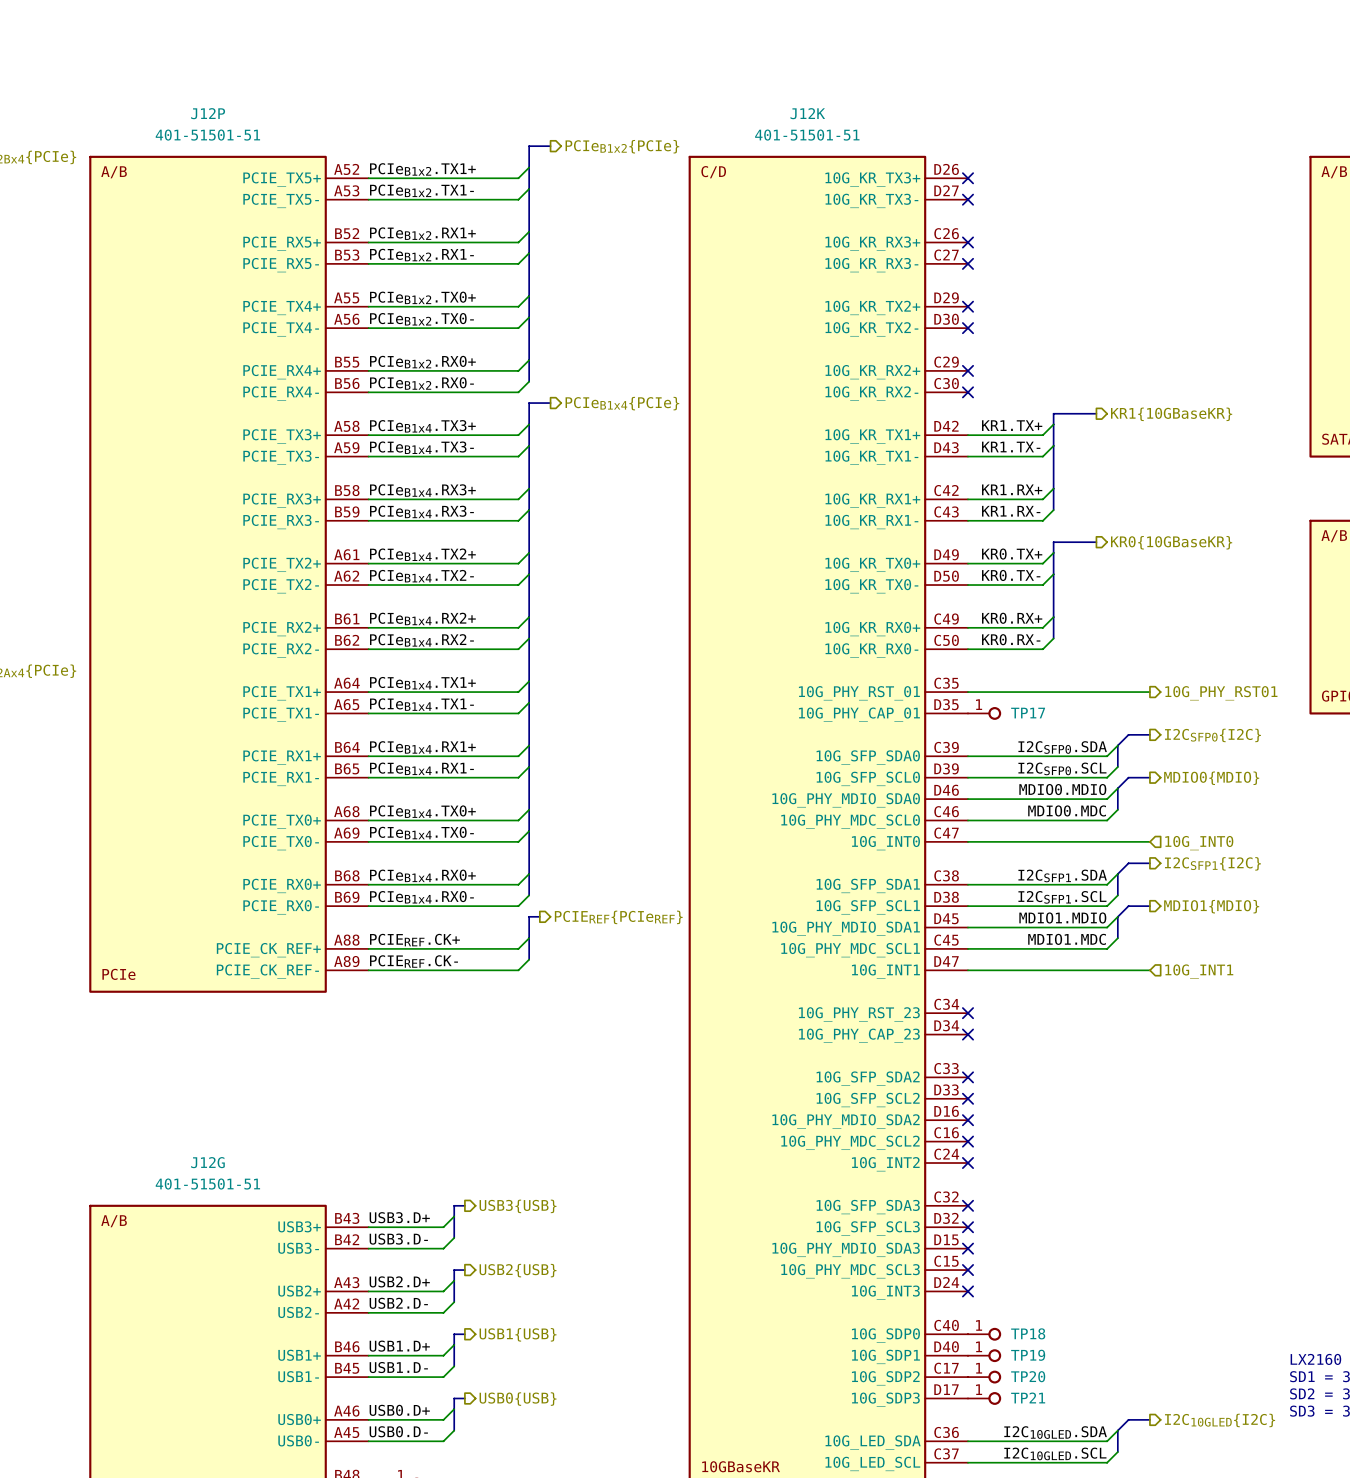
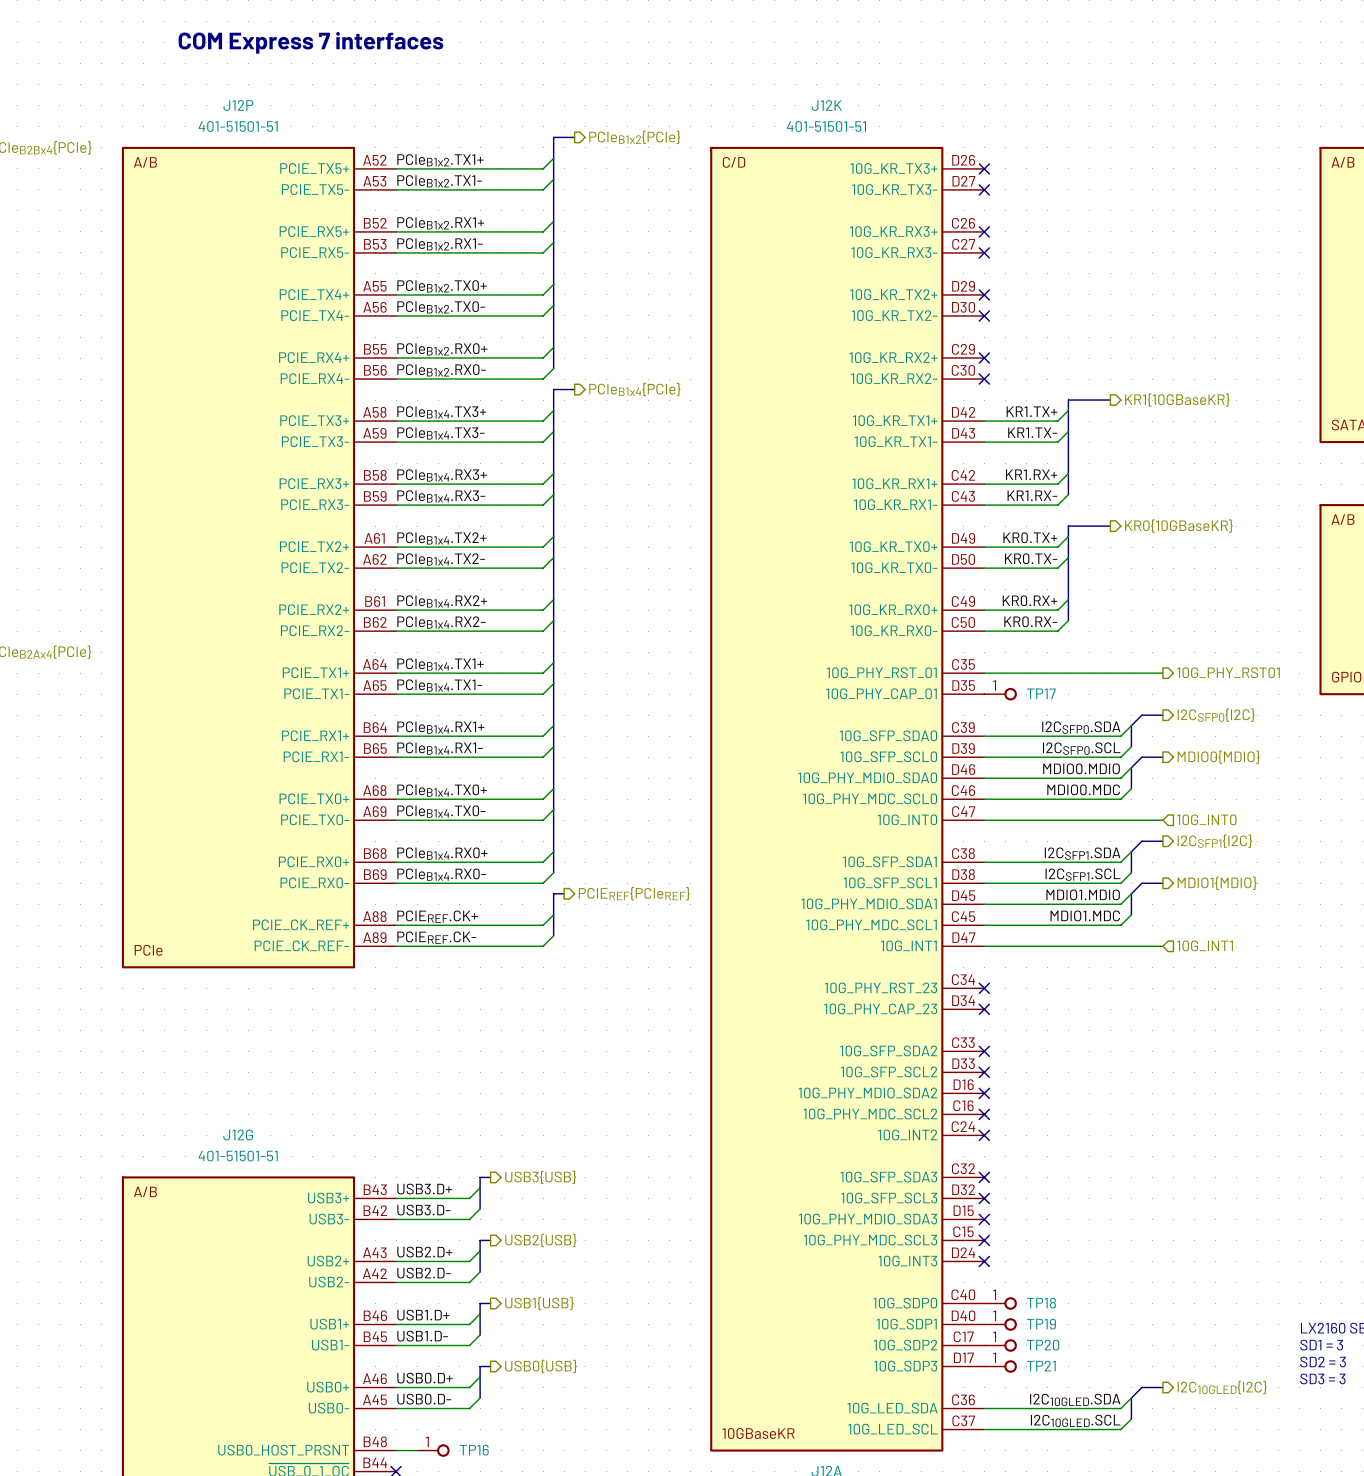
text: none -> COM Express 7 interfaces (310, 42)

